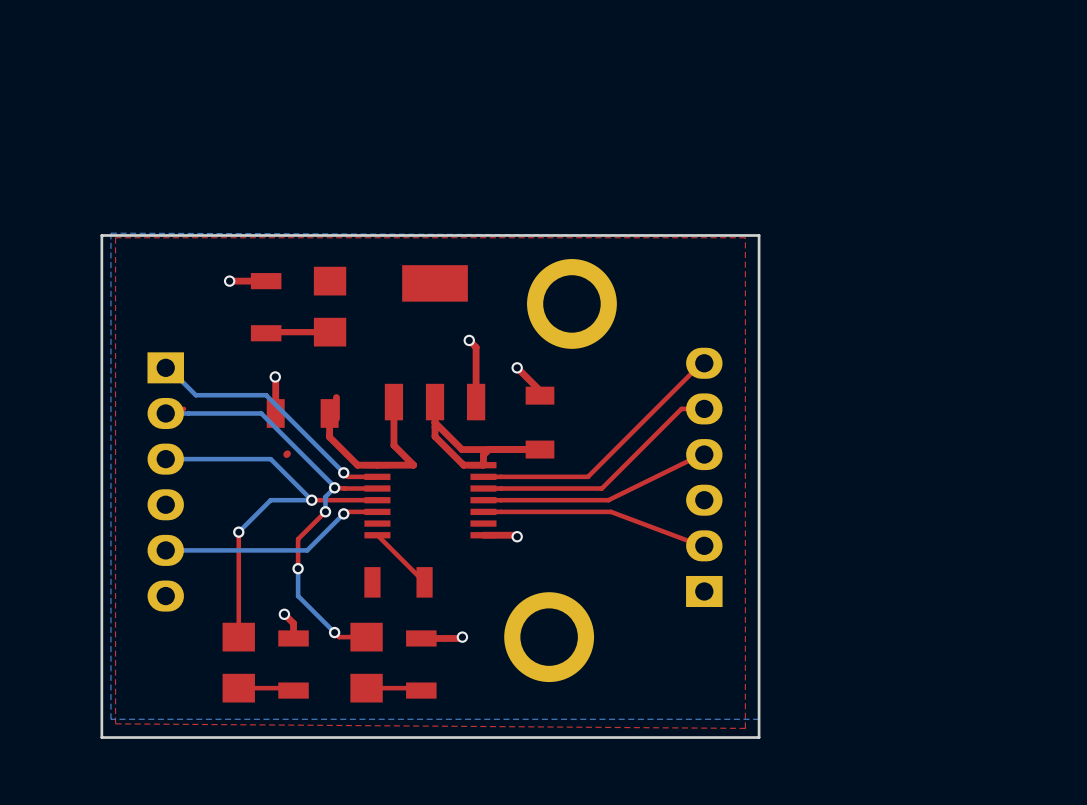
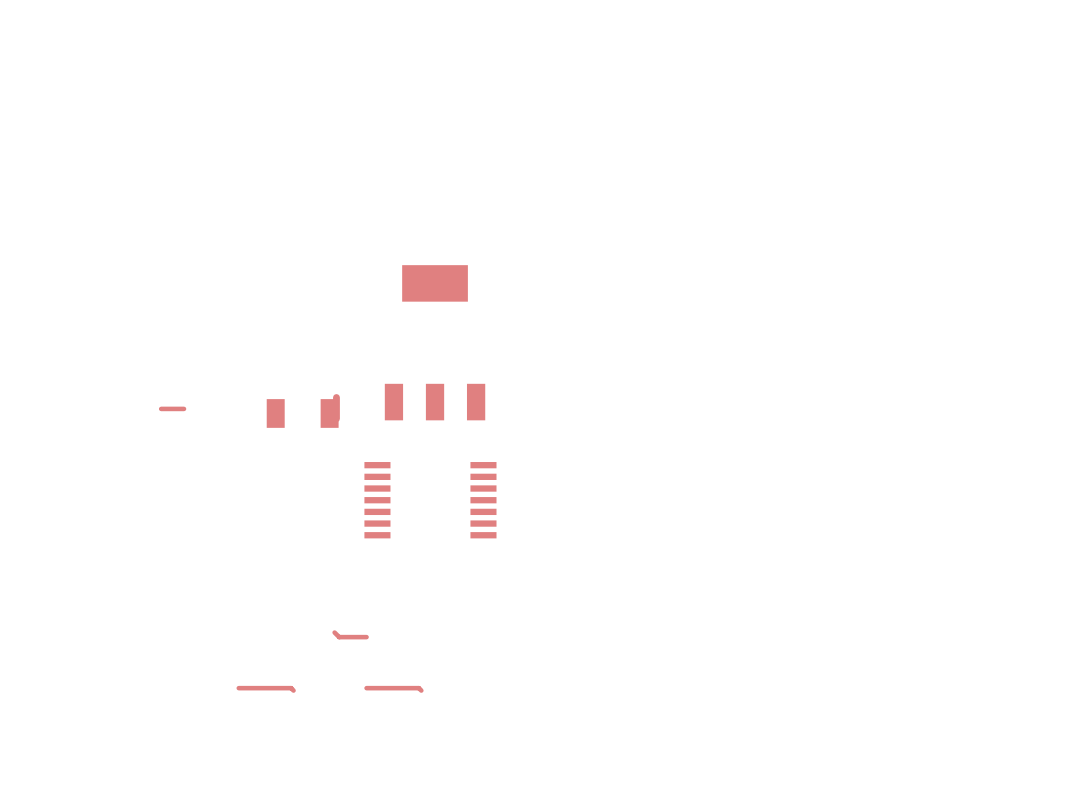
bottom zone outline: (110, 233) (110, 719) (759, 719) (759, 235) (110, 233) -> none
board edge: (759, 235) (759, 737) (101, 737) (101, 235) (759, 235) -> none
top zone outline: (745, 237) (745, 728) (115, 723) (115, 237) (745, 237) -> none
via: (229, 281) -> none
top track: (266, 281) (229, 281) -> none
part: (571, 303) -> none
part: (330, 306) -> none
part: (266, 307) -> none
top track: (330, 332) (266, 333) -> none
top track: (469, 340) (476, 347) (476, 402) -> none
via: (469, 340) -> none
top track: (704, 363) (701, 363) (588, 476) (483, 476) -> none
bottom track: (165, 367) (168, 367) (195, 395) (266, 395) (343, 472) -> none
top track: (517, 367) (540, 390) (540, 395) -> none
via: (517, 367) -> none
top track: (275, 376) (275, 413) -> none
via: (275, 376) -> none
top track: (393, 402) (393, 445) (413, 465) (357, 465) (329, 437) (329, 413) -> none
top track: (435, 402) (435, 436) (463, 465) (483, 465) (483, 455) (489, 449) -> none
top track: (704, 408) (681, 408) (601, 488) (483, 488) -> none
bottom track: (165, 413) (261, 413) (335, 487) (325, 496) (325, 511) -> none
top track: (435, 422) (461, 449) (540, 449) -> none
part: (540, 422) -> none
top track: (287, 453) (286, 454) -> none
top track: (704, 454) (608, 500) (483, 500) -> none
bottom track: (165, 459) (270, 459) (311, 500) (270, 500) (238, 532) -> none
top track: (343, 472) (347, 476) (377, 476) -> none
via: (343, 472) -> none
part: (704, 477) -> none
part: (165, 481) -> none
top track: (334, 487) (377, 488) -> none
via: (334, 487) -> none
via: (311, 500) -> none
top track: (377, 500) (311, 500) -> none
top track: (325, 511) (298, 539) (298, 568) -> none
via: (325, 511) -> none
top track: (377, 511) (345, 511) (343, 513) -> none
top track: (483, 511) (611, 511) (704, 545) -> none
bottom track: (343, 513) (307, 550) (165, 550) -> none
via: (343, 513) -> none
top track: (238, 532) (238, 637) -> none
via: (238, 532) -> none
top track: (377, 535) (424, 582) -> none
top track: (483, 535) (517, 536) -> none
via: (517, 536) -> none
bottom track: (298, 568) (298, 596) (334, 632) -> none
via: (298, 568) -> none
part: (398, 582) -> none
top track: (284, 614) (293, 623) (293, 638) -> none
via: (284, 614) -> none
via: (334, 632) -> none
top track: (462, 637) (421, 638) -> none
via: (462, 637) -> none
part: (549, 637) -> none
part: (238, 662) -> none
part: (366, 662) -> none
part: (293, 664) -> none
part: (421, 664) -> none

